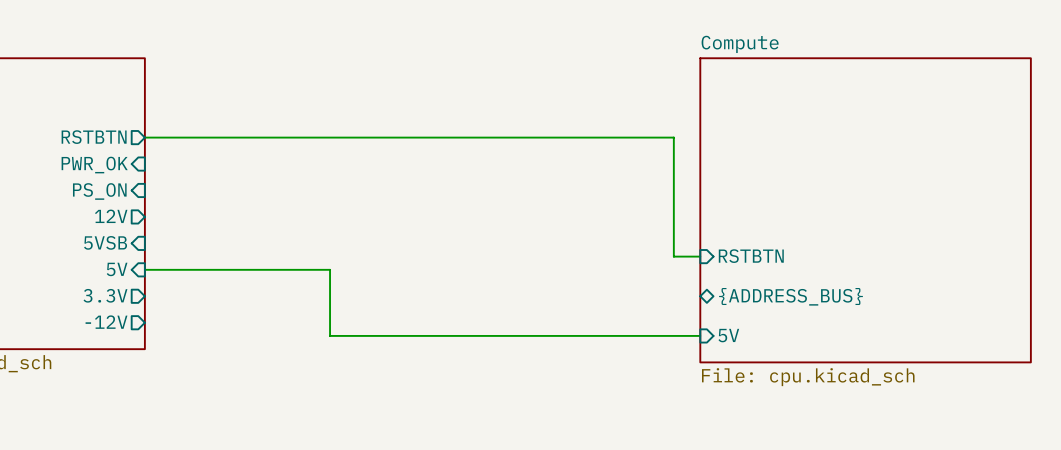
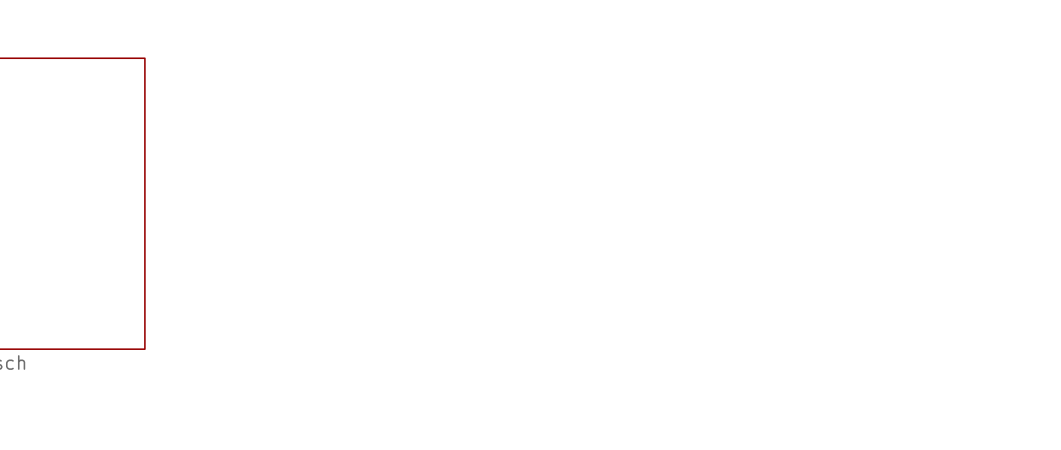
sheet pin: RSTBTN (94, 137) -> none
wire: (144, 137) (673, 137) (673, 256) (700, 256) -> none
sheet pin: PWR_OK (94, 165) -> none
sheet pin: PS_ON (99, 191) -> none
sheet Compute: File: cpu.kicad_sch (865, 210) -> none
sheet pin: 12V (111, 216) -> none
sheet pin: 5VSB (105, 242) -> none
sheet pin: RSTBTN (751, 256) -> none
sheet pin: 5V (117, 269) -> none
wire: (144, 269) (330, 269) (330, 335) (700, 335) -> none
sheet pin: 3.3V (105, 295) -> none
sheet pin: {ADDRESS_BUS} (790, 296) -> none
sheet pin: -12V (106, 322) -> none
sheet pin: 5V (728, 335) -> none

